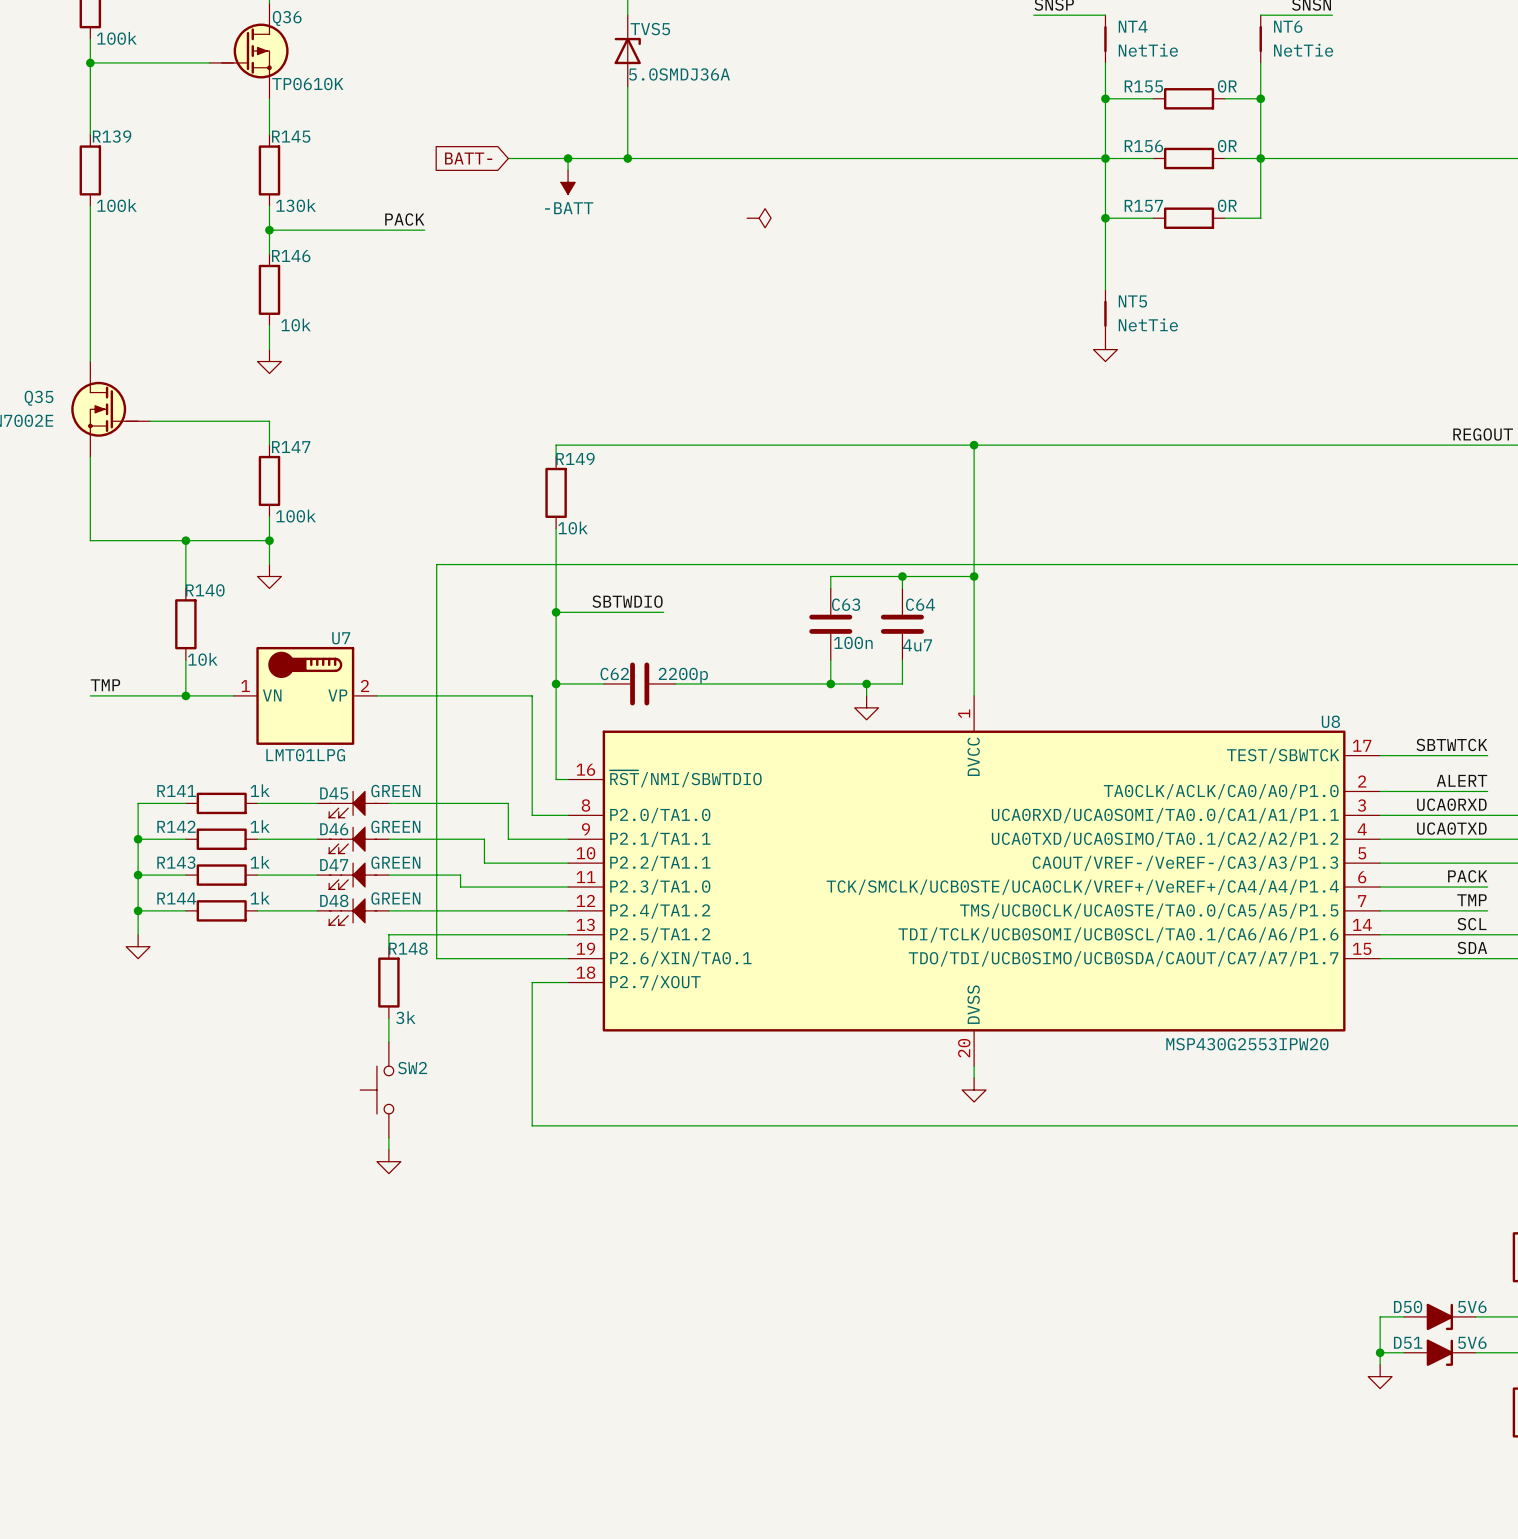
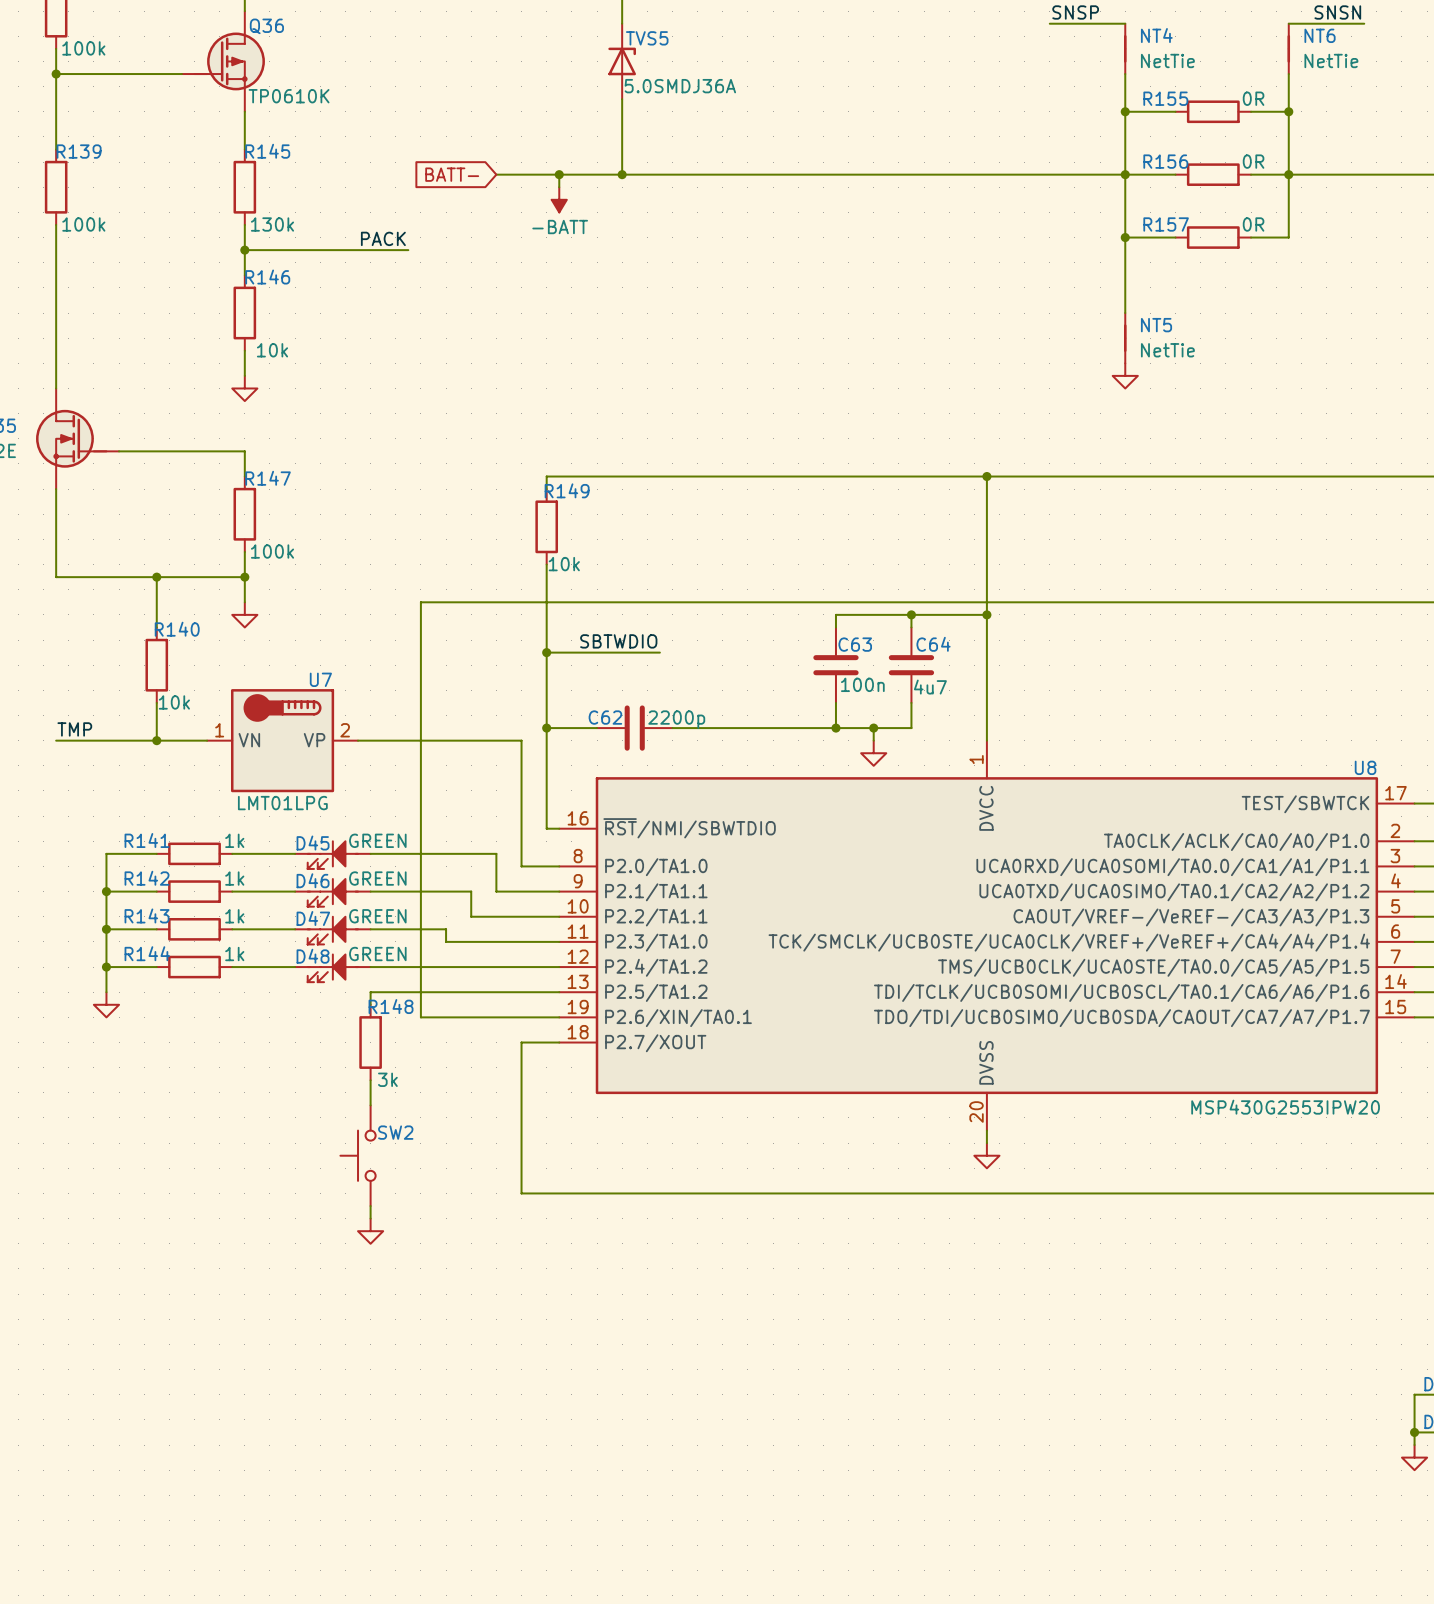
power symbol: (759, 218) -> none

